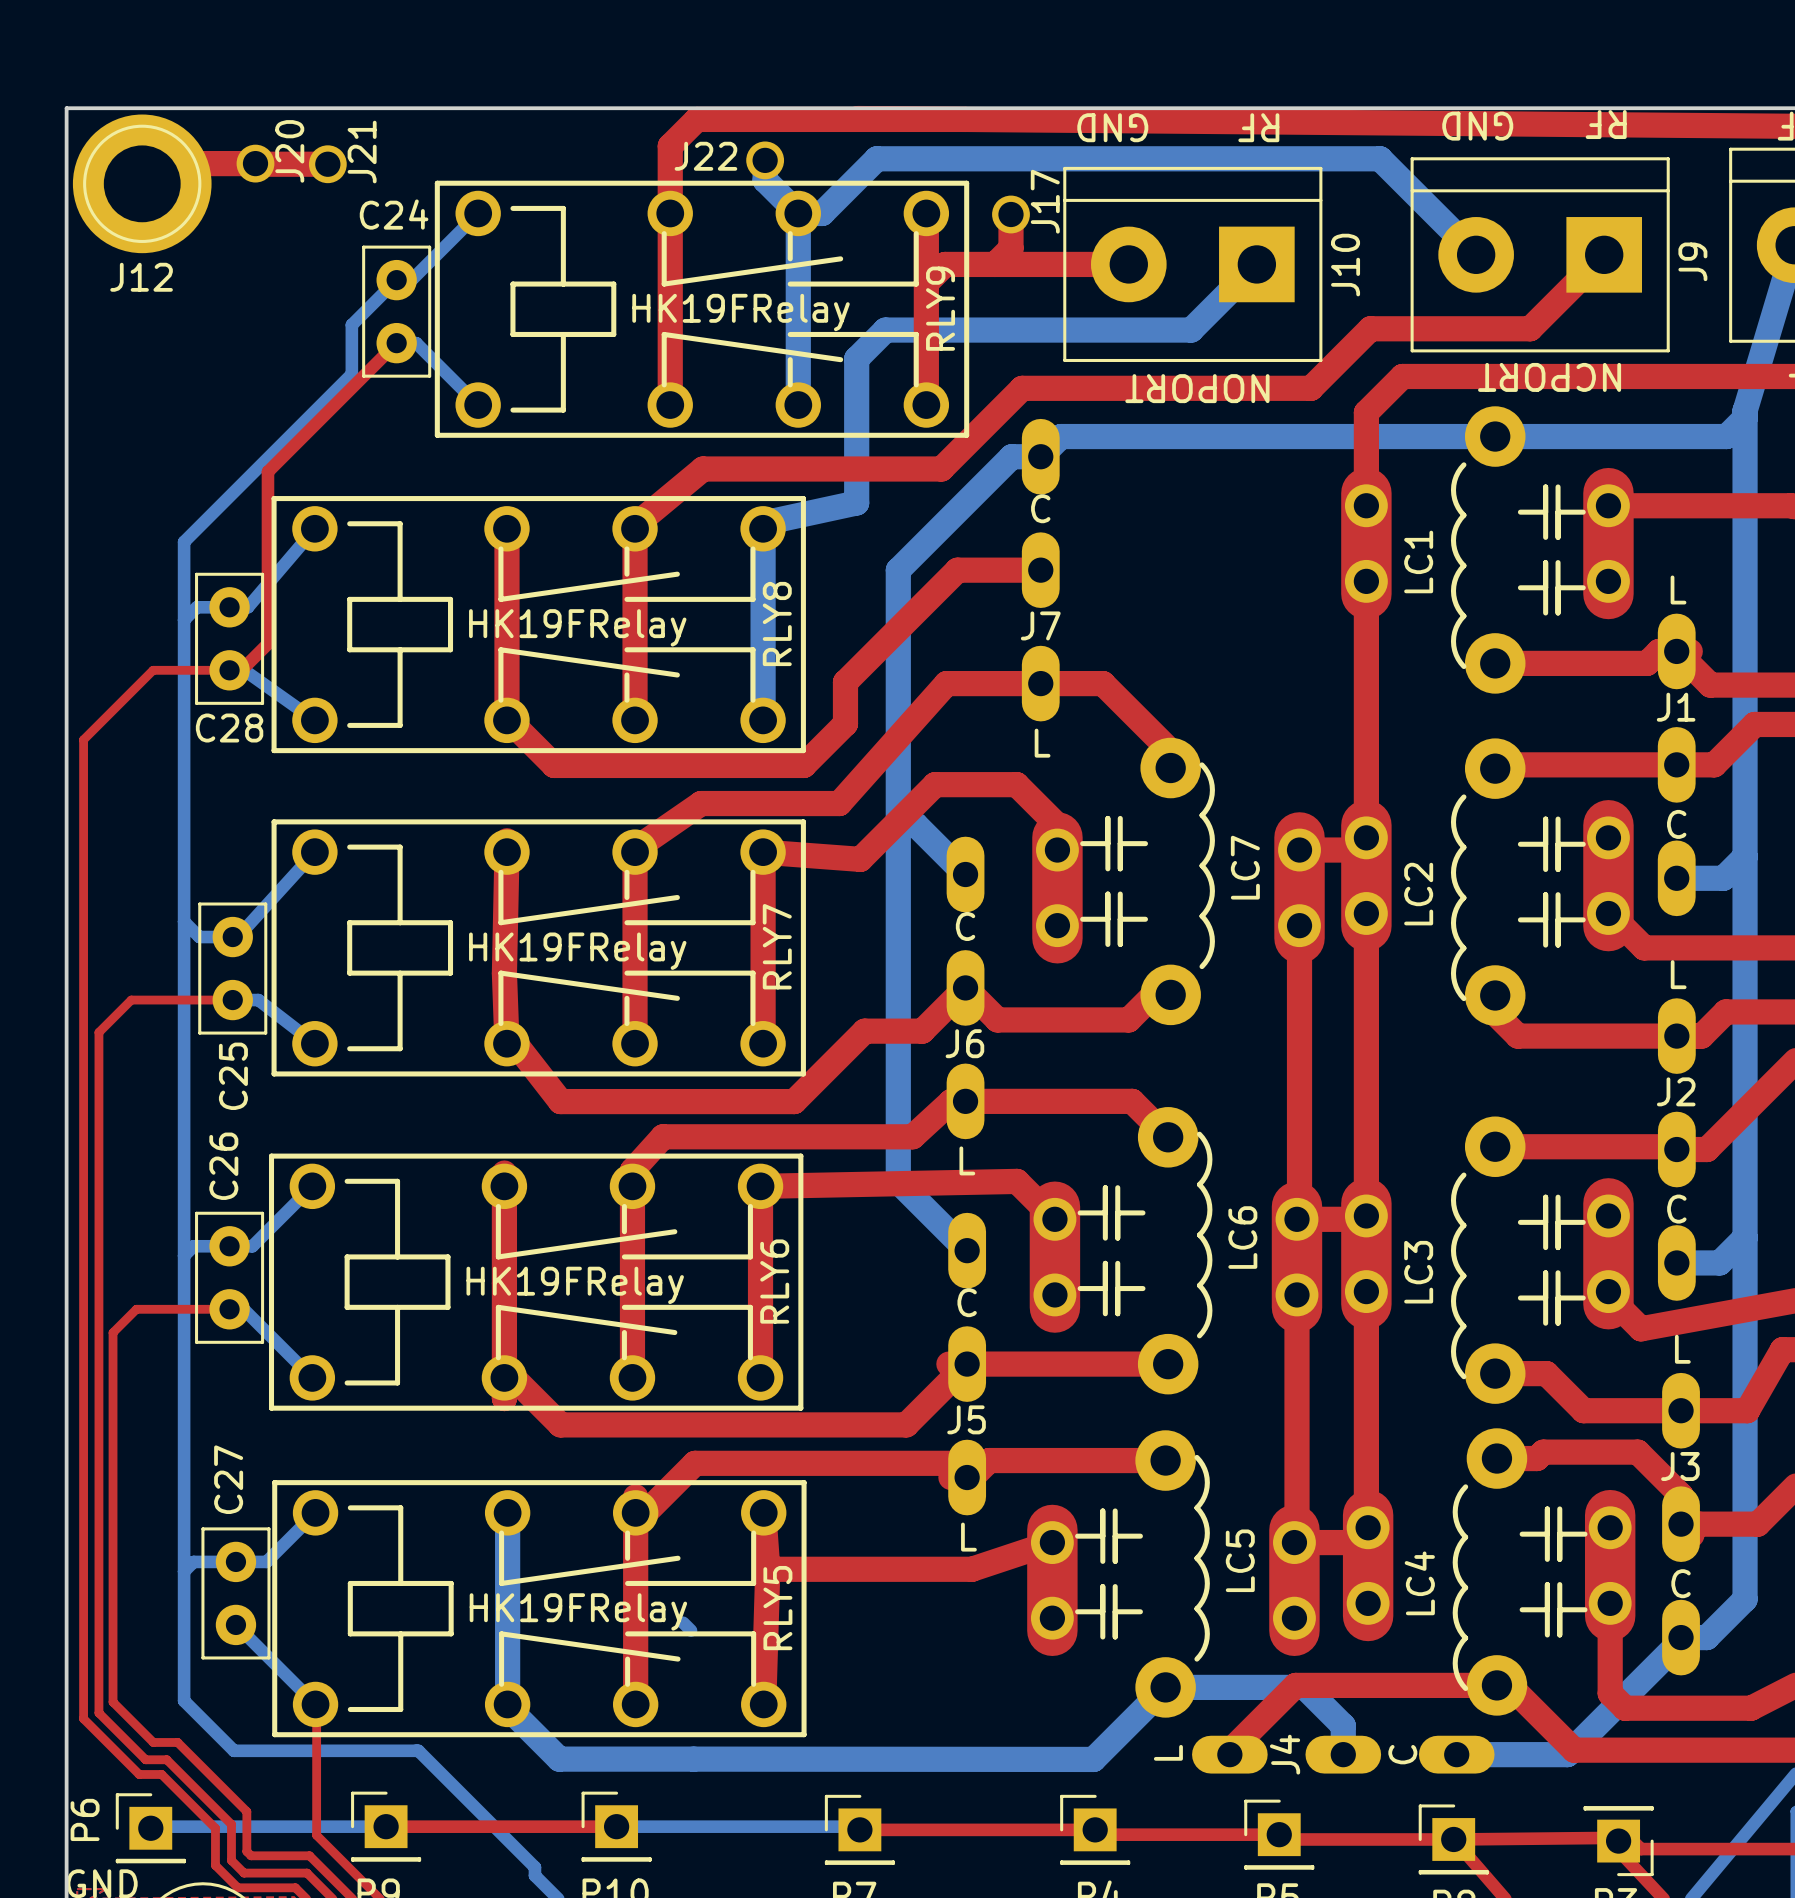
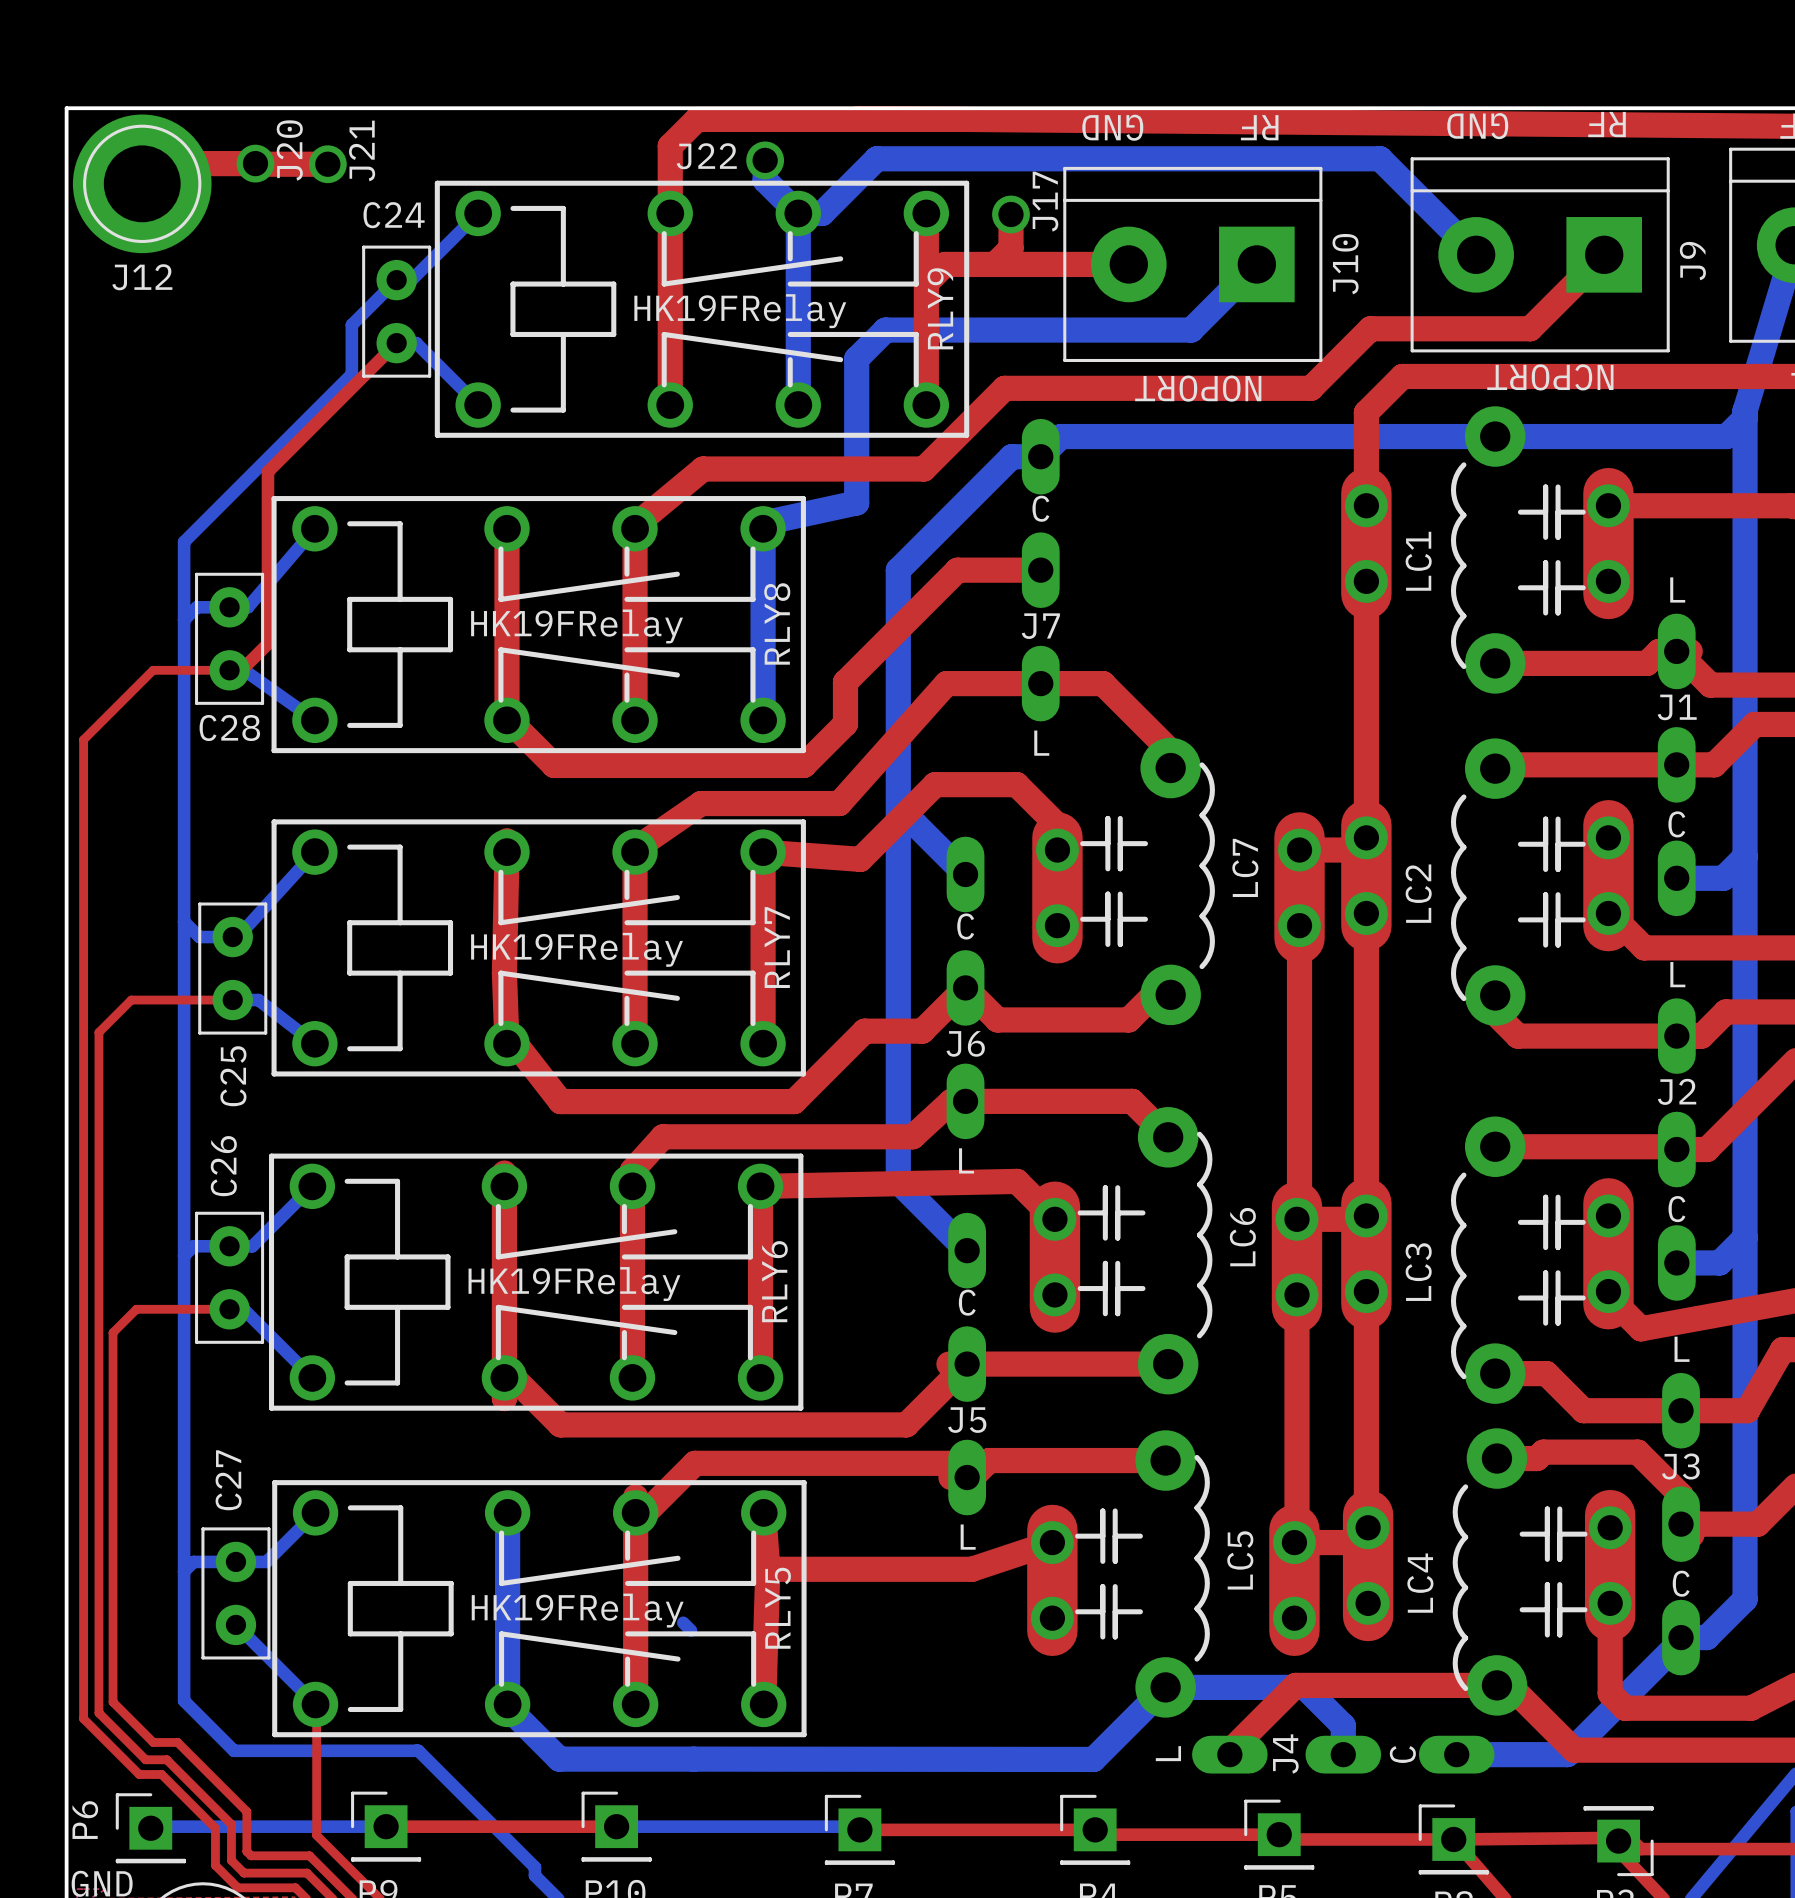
top track: (1022, 388) (941, 469) (923, 469) -> (1022, 388) (1004, 388) (923, 469)

